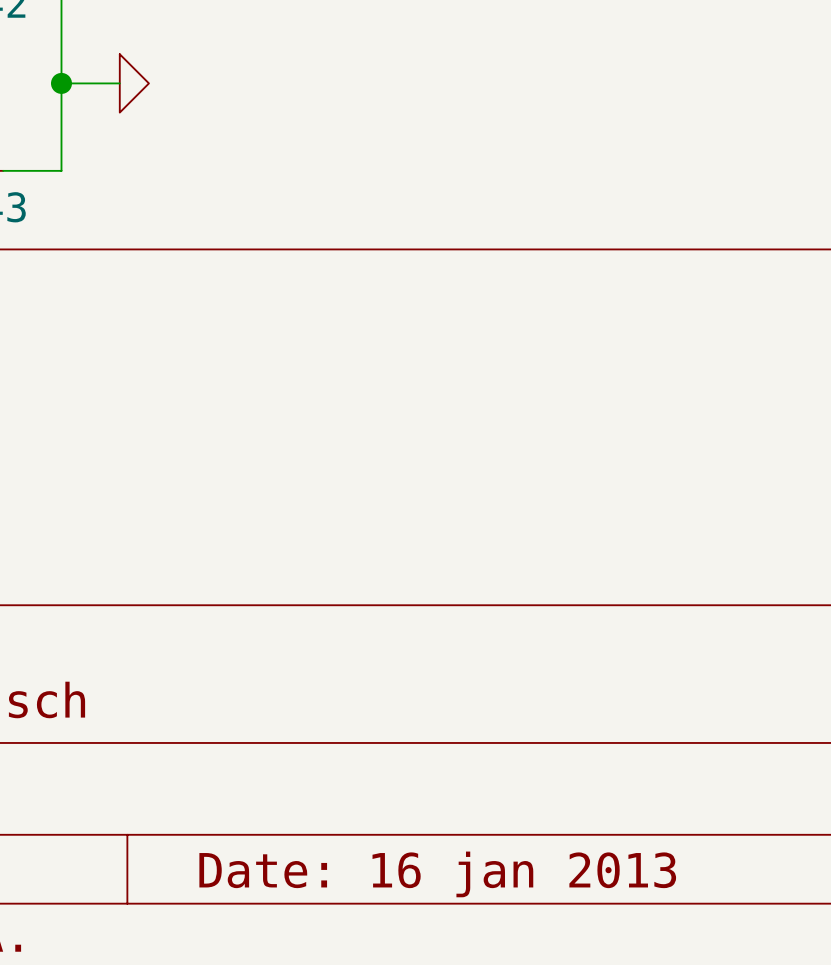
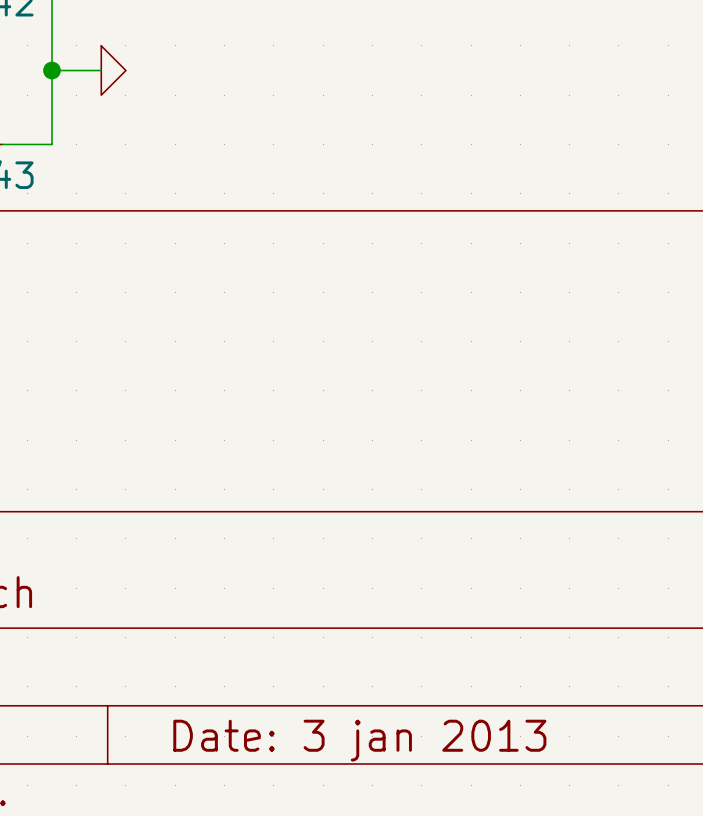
title block: Date: 16 jan 2013 (437, 874) -> Date: 3 jan 2013 (359, 740)

